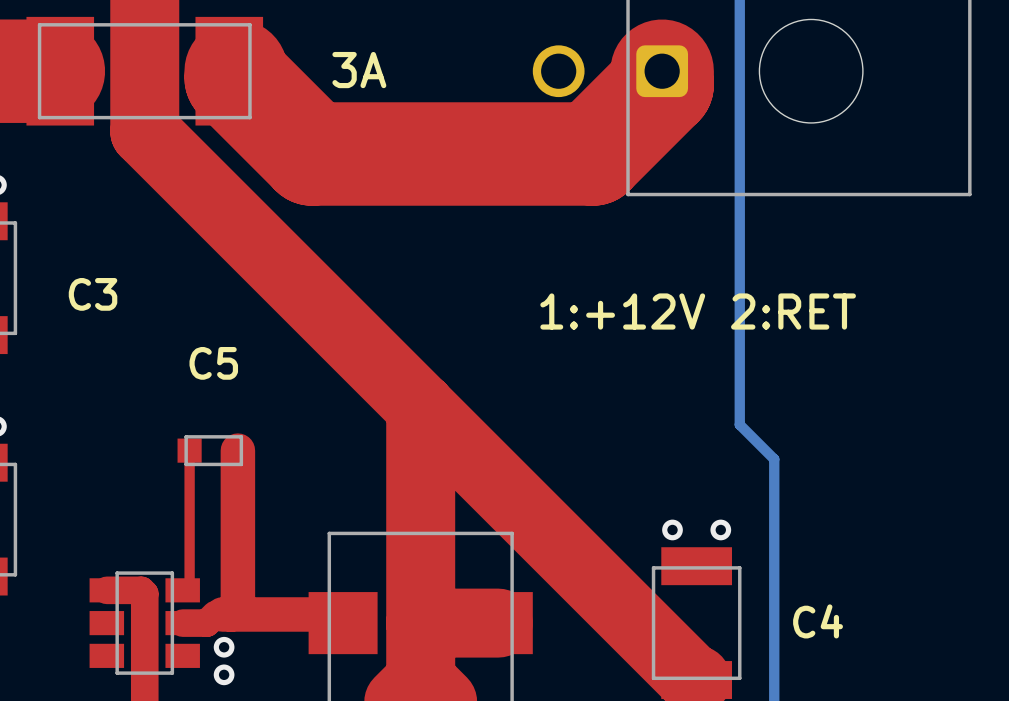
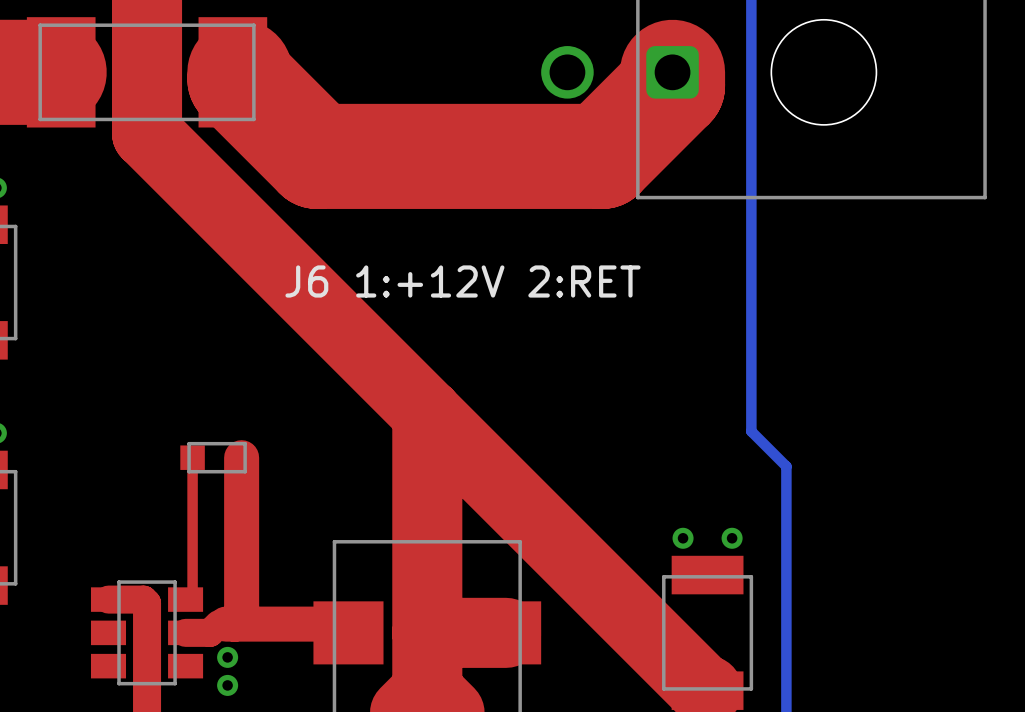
text: 3A (359, 70) -> none
C3 name: C3 (93, 294) -> none
text: 1:+12V 2:RET (698, 311) -> J6 1:+12V 2:RET (463, 281)
C5 name: C5 (213, 363) -> none
C4 name: C4 (818, 621) -> none

